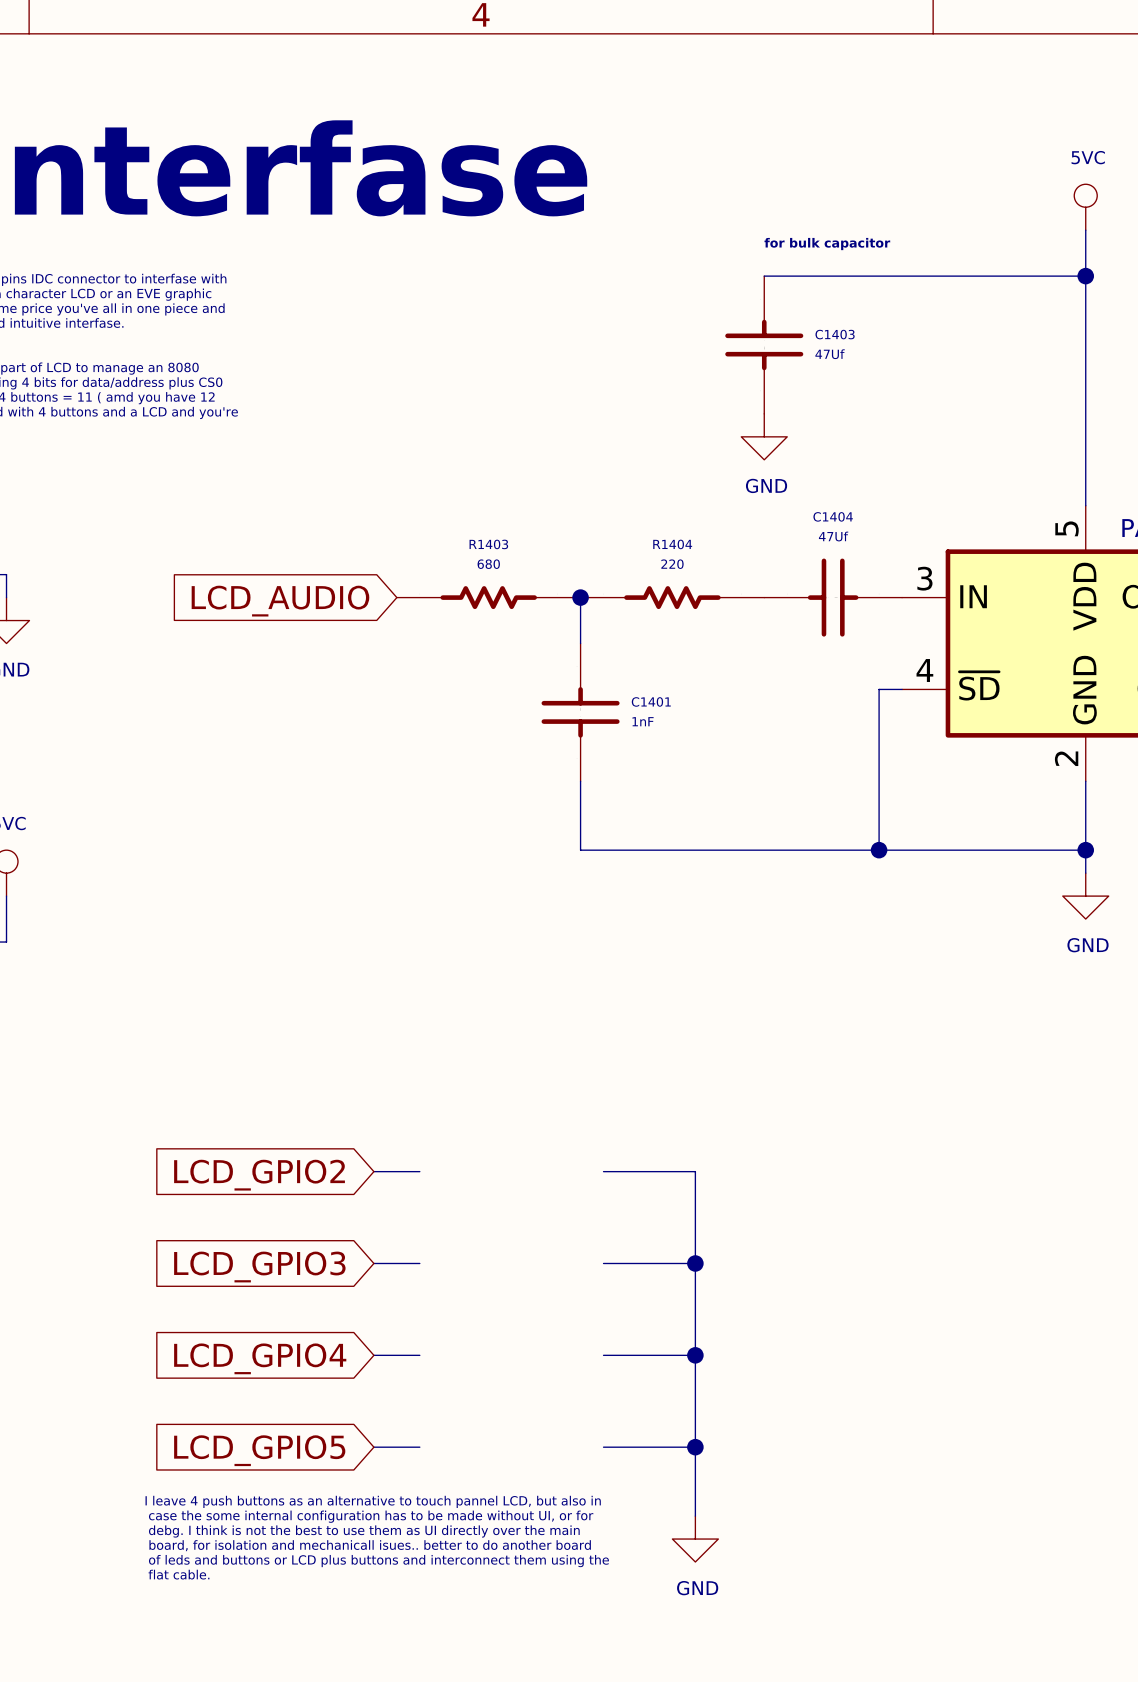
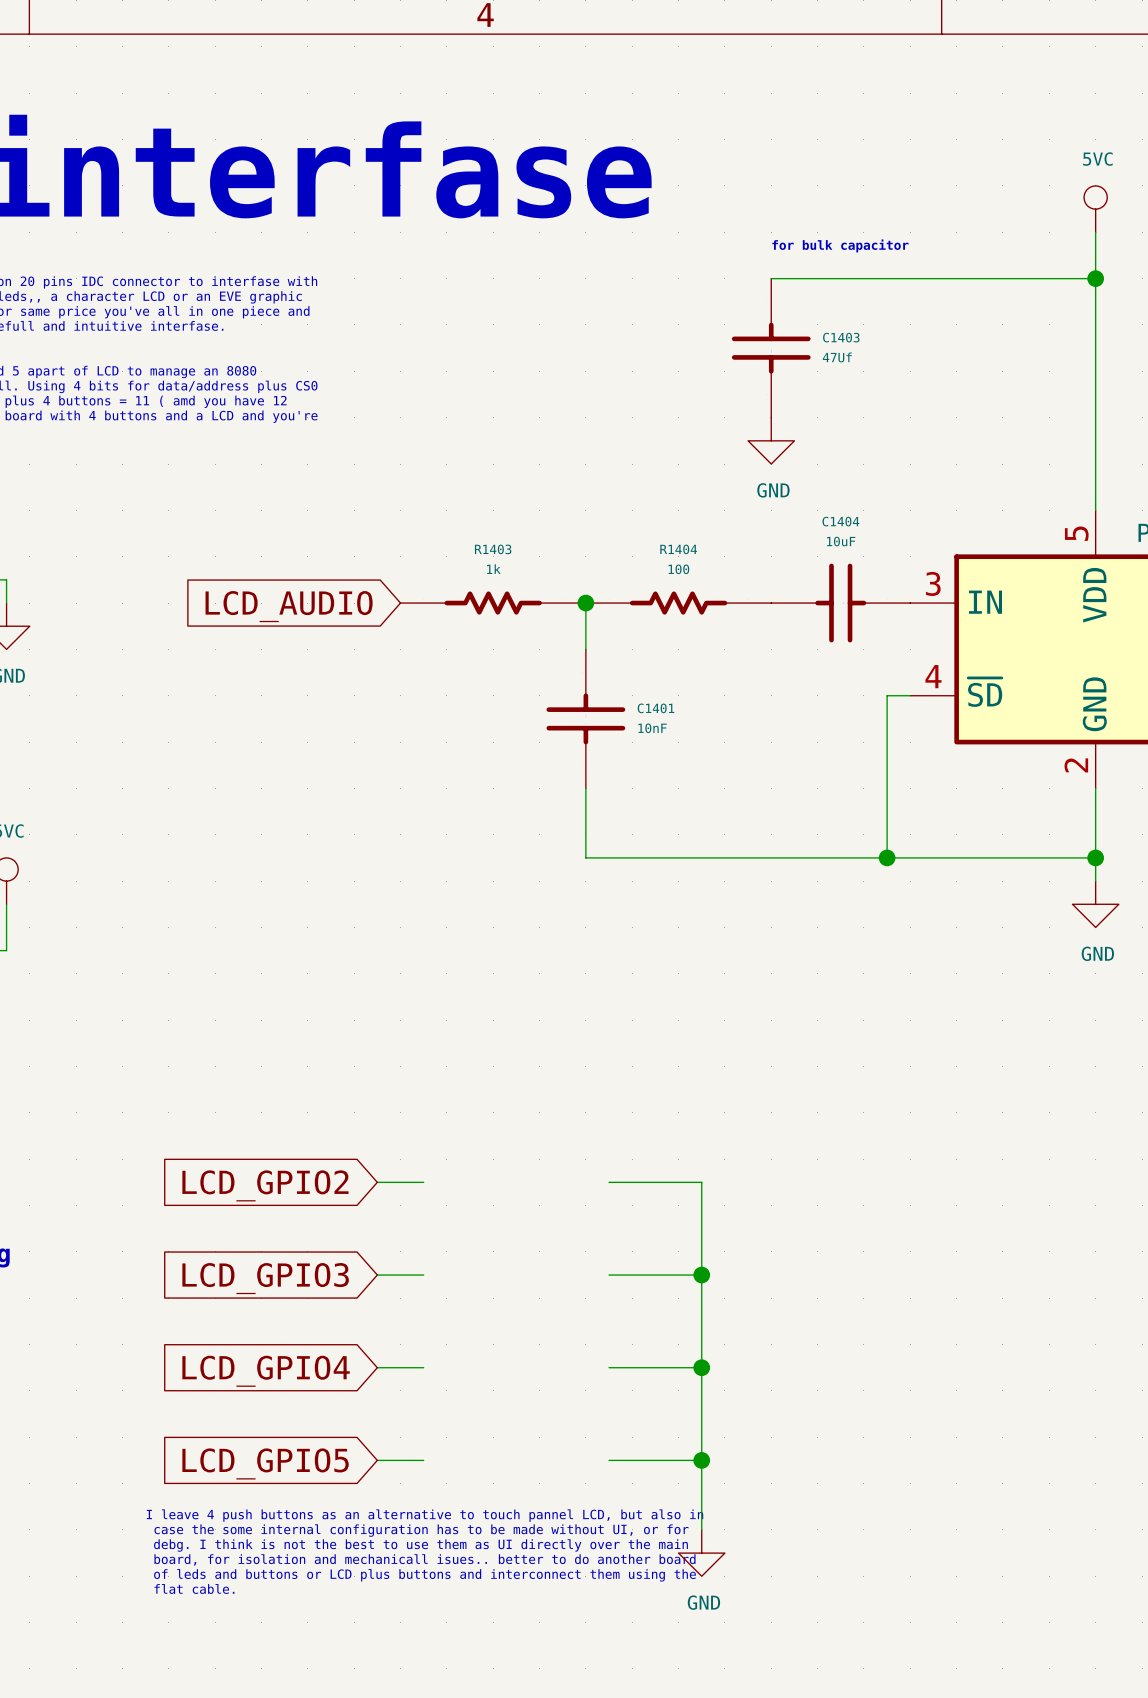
C1404 value: 47Uf (833, 536) -> 10uF (841, 541)
R1403 value: 680 (488, 564) -> 1k (493, 569)
R1404 value: 220 (672, 564) -> 100 (678, 569)
C1401 value: 1nF (643, 721) -> 10nF (652, 728)

